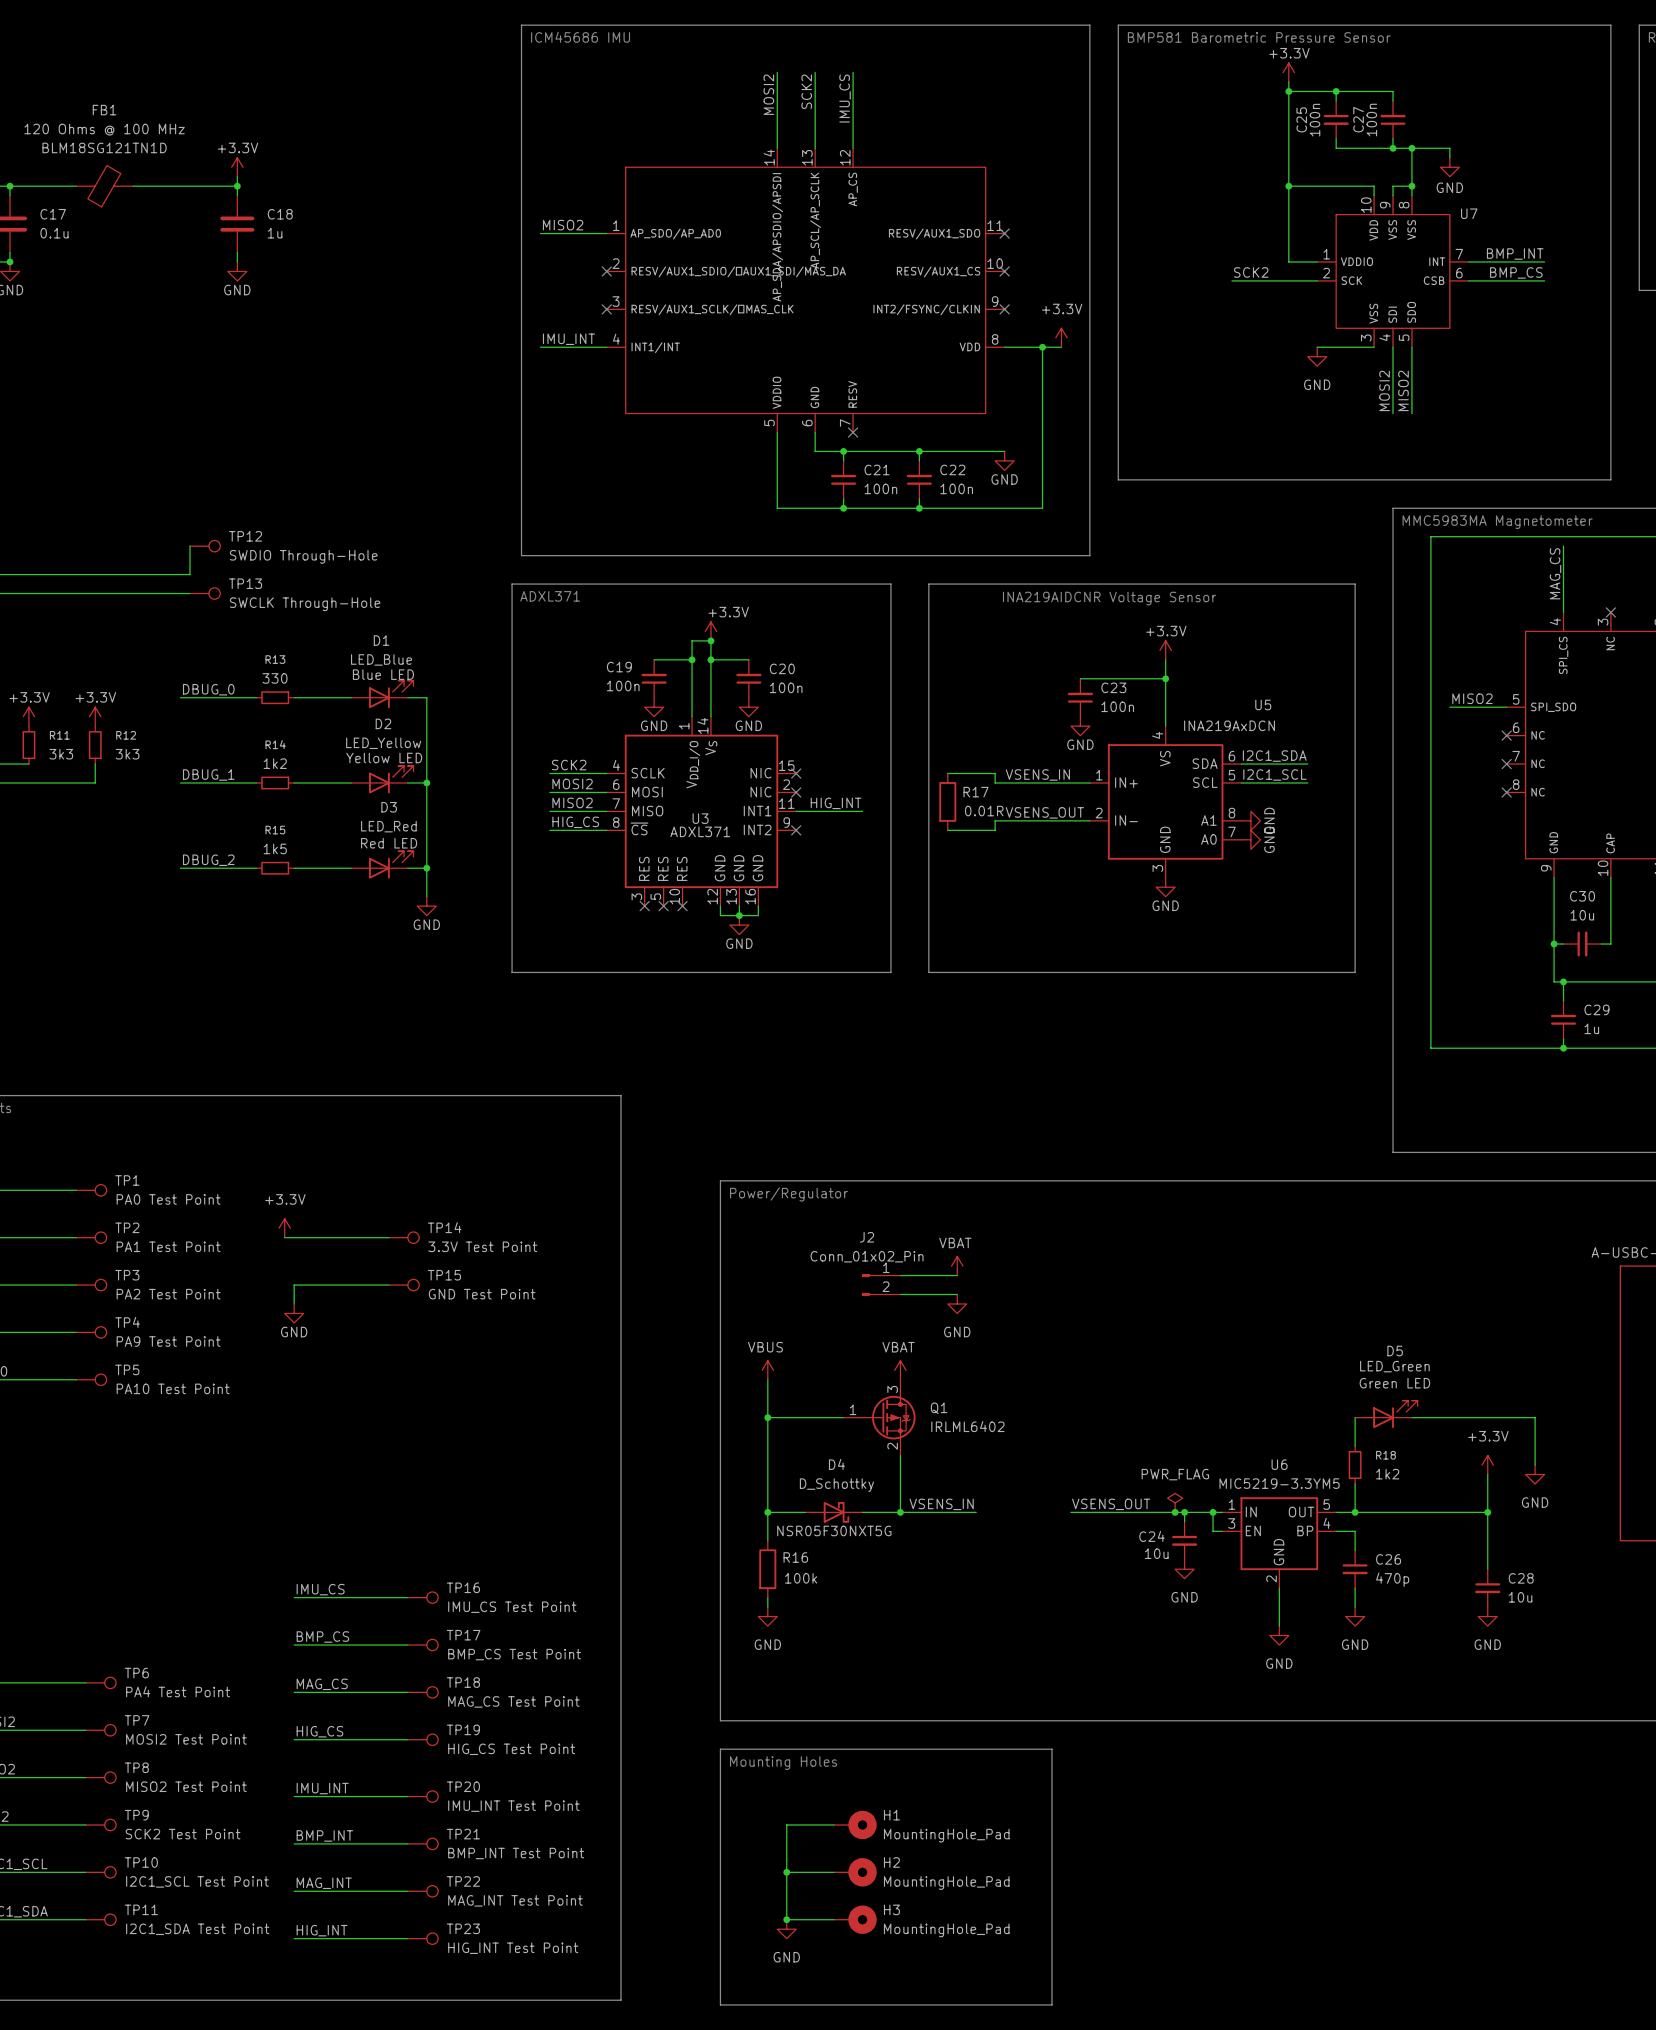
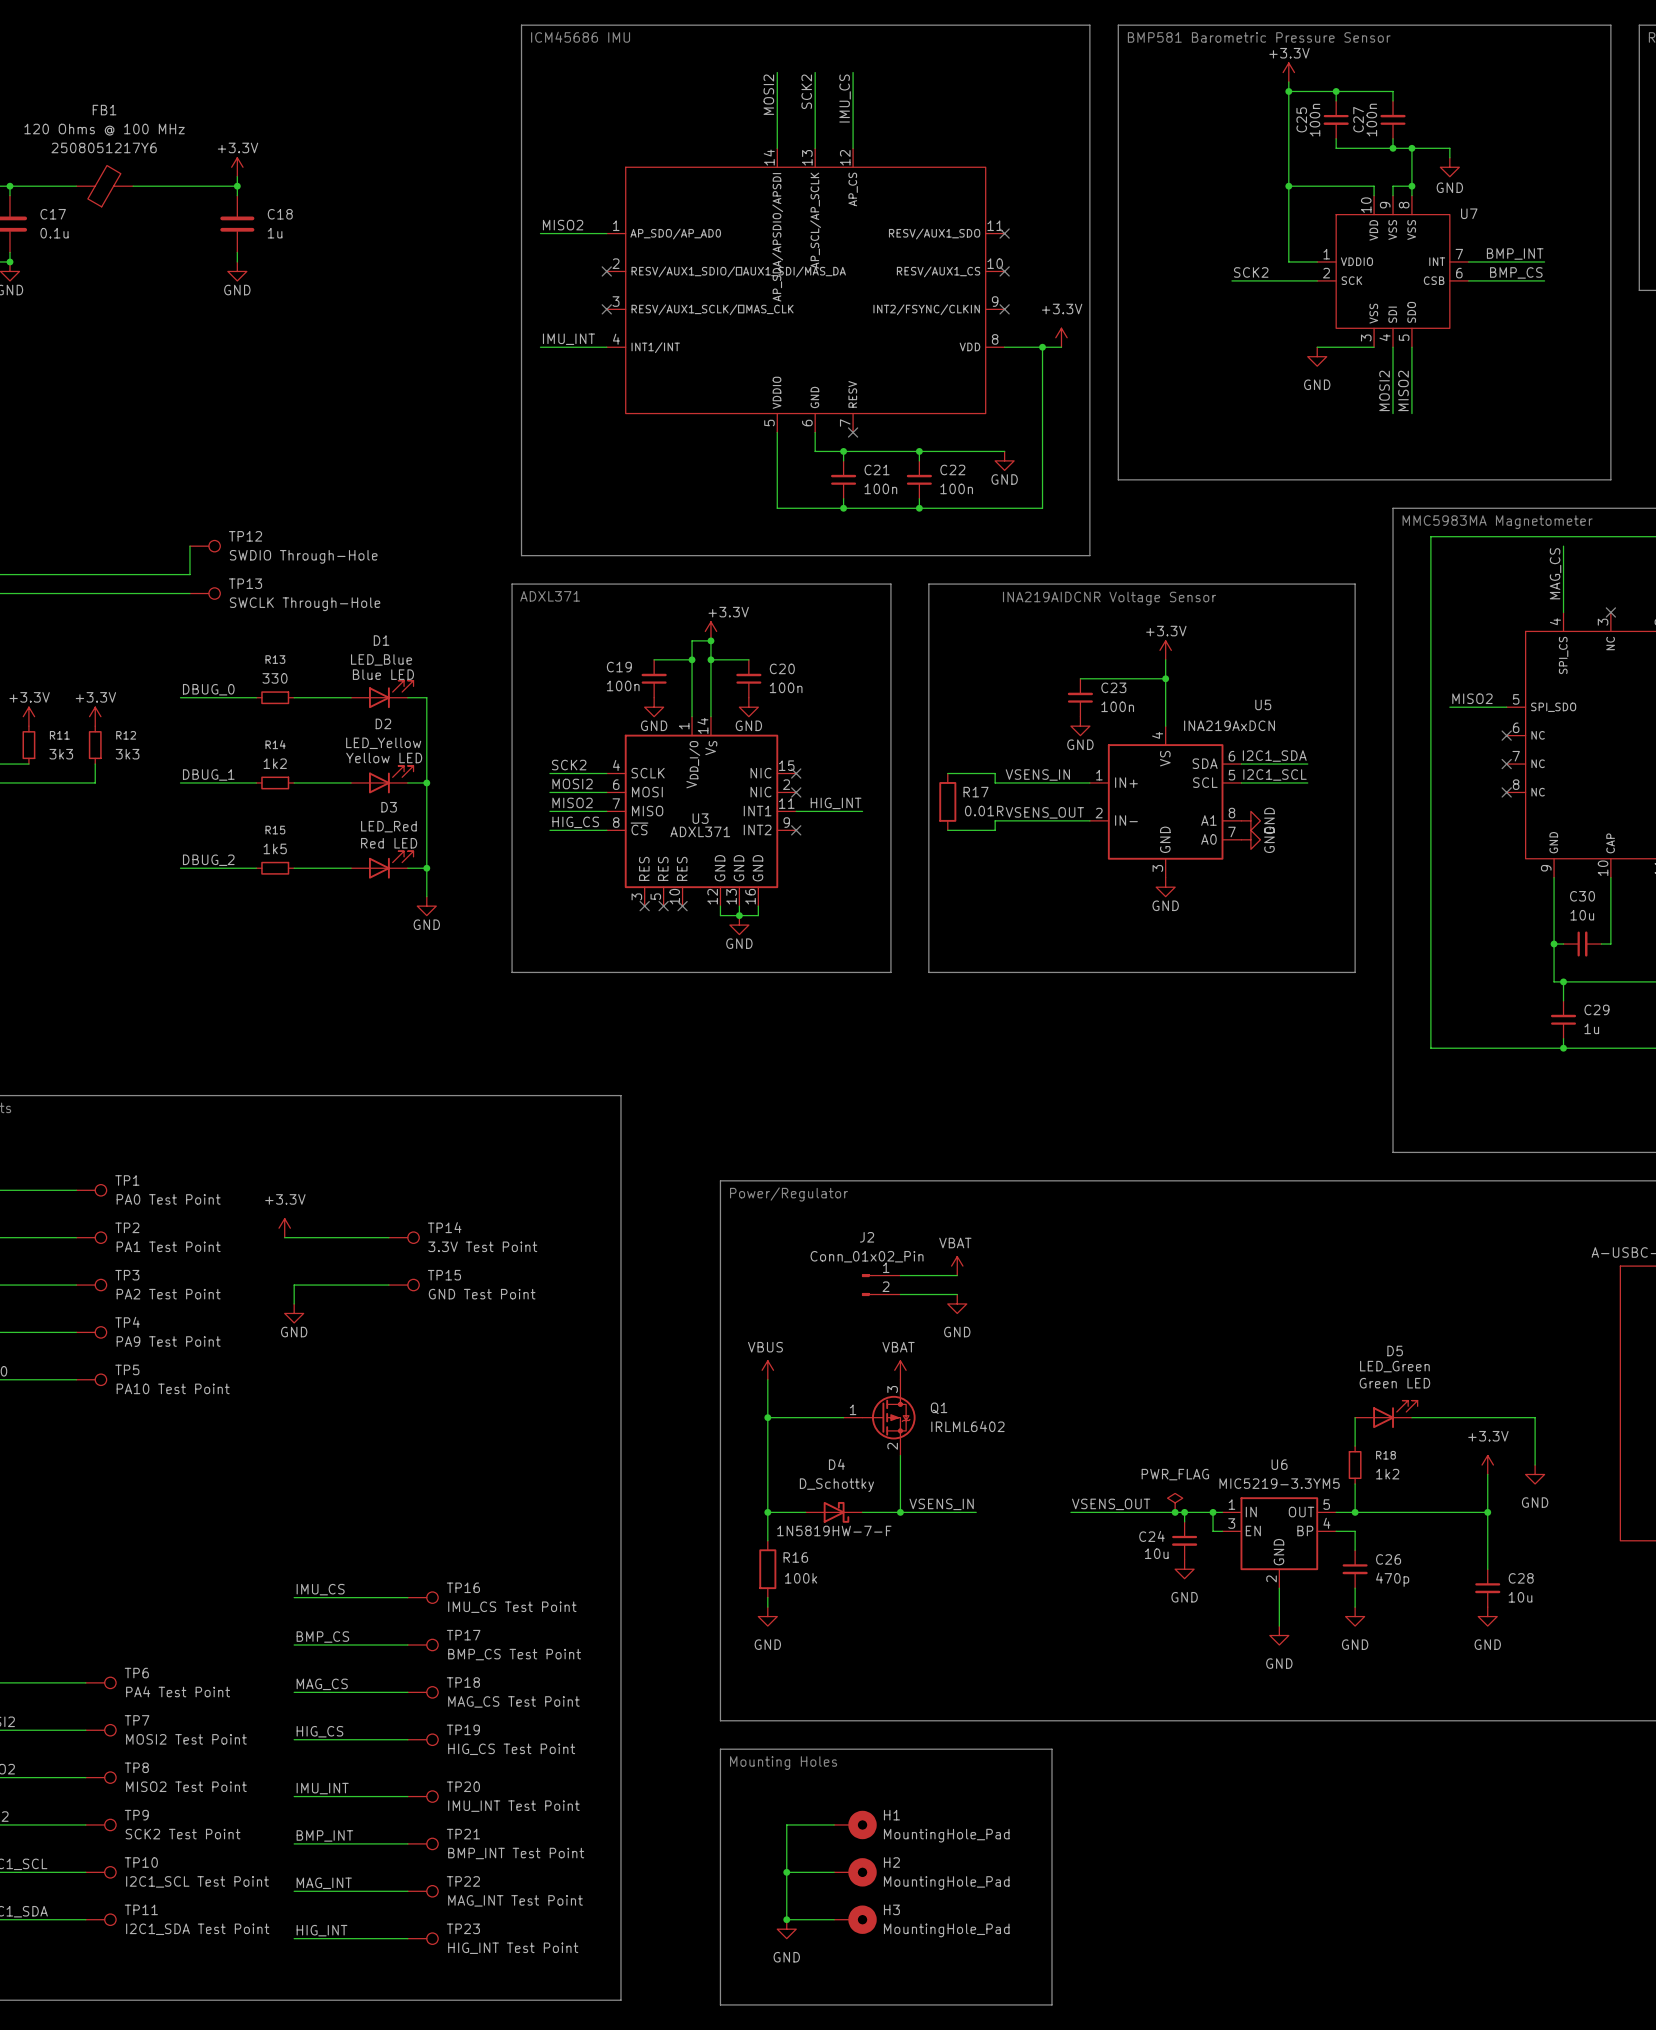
FB1 text: BLM18SG121TN1D (104, 147) -> 2508051217Y6 (104, 147)
D4 text: NSR05F30NXT5G (834, 1530) -> 1N5819HW-7-F (834, 1530)

